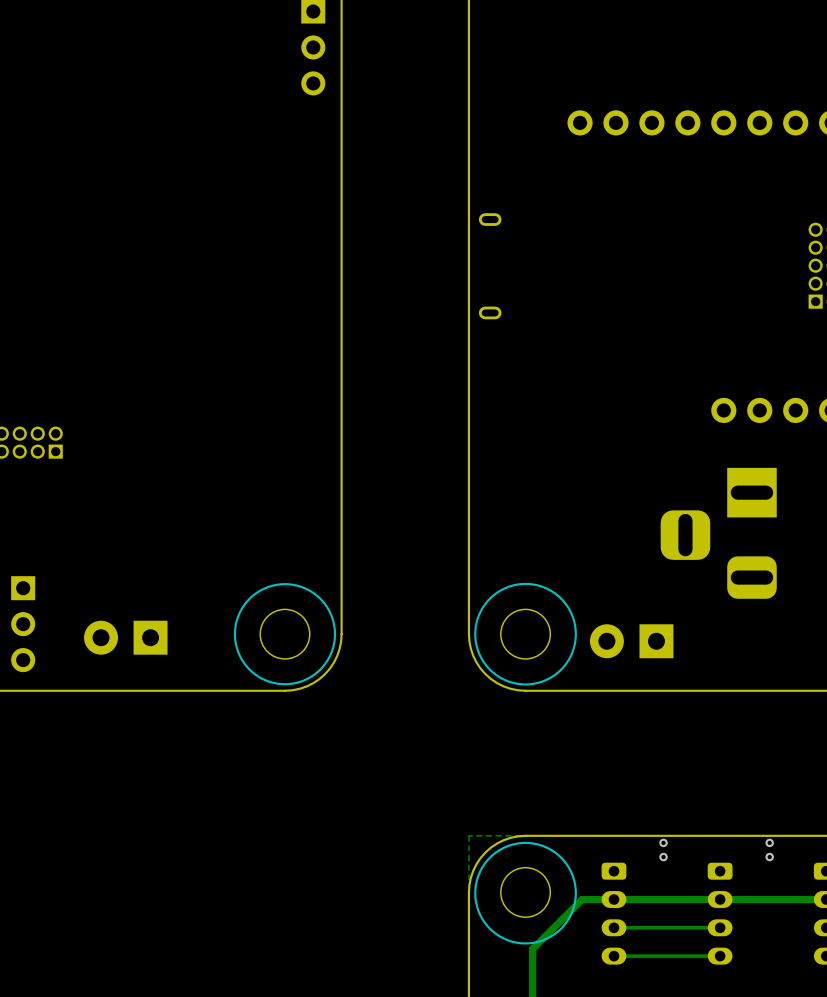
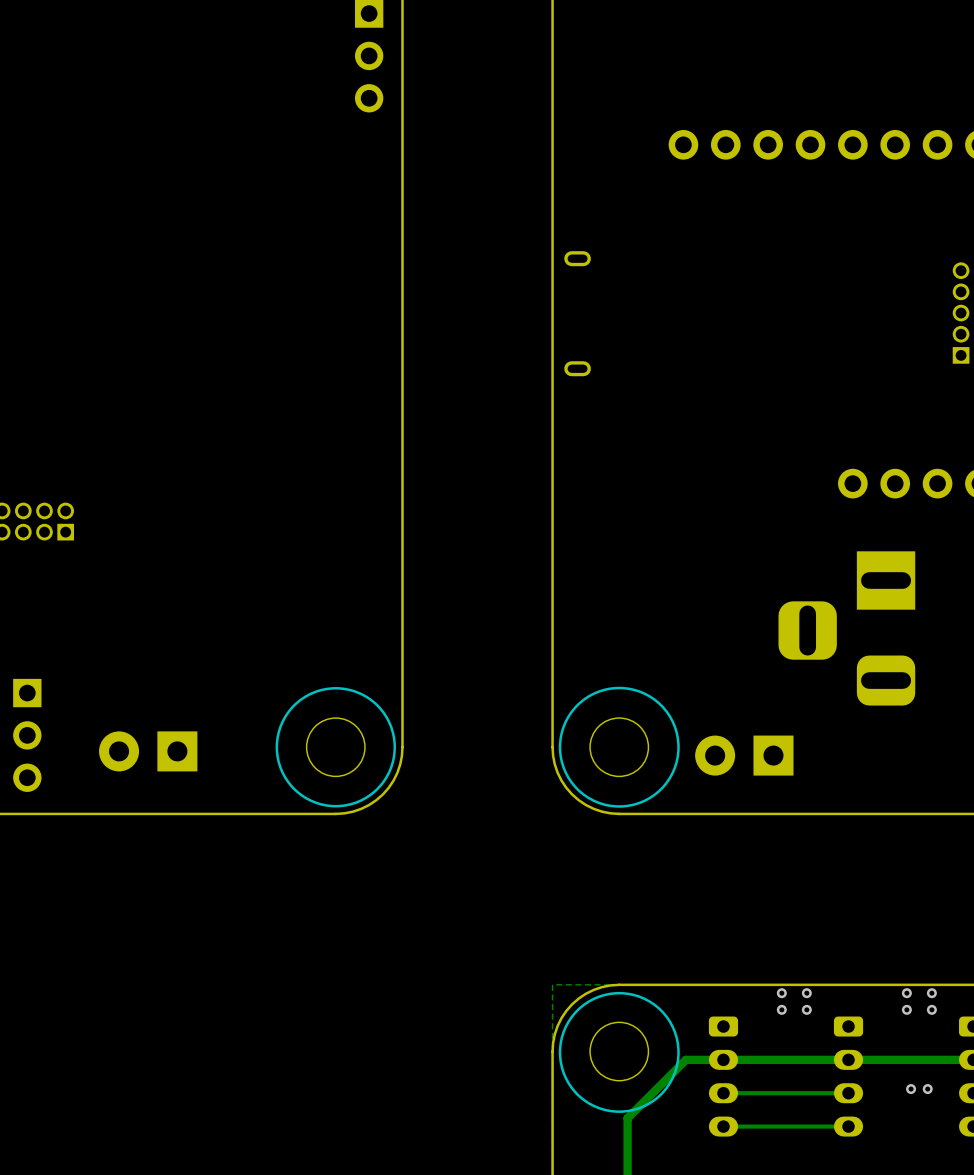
via: none -> (806, 993)
via: none -> (931, 993)
via: none -> (806, 1009)
via: none -> (931, 1009)
via: none -> (911, 1089)
via: none -> (927, 1089)

